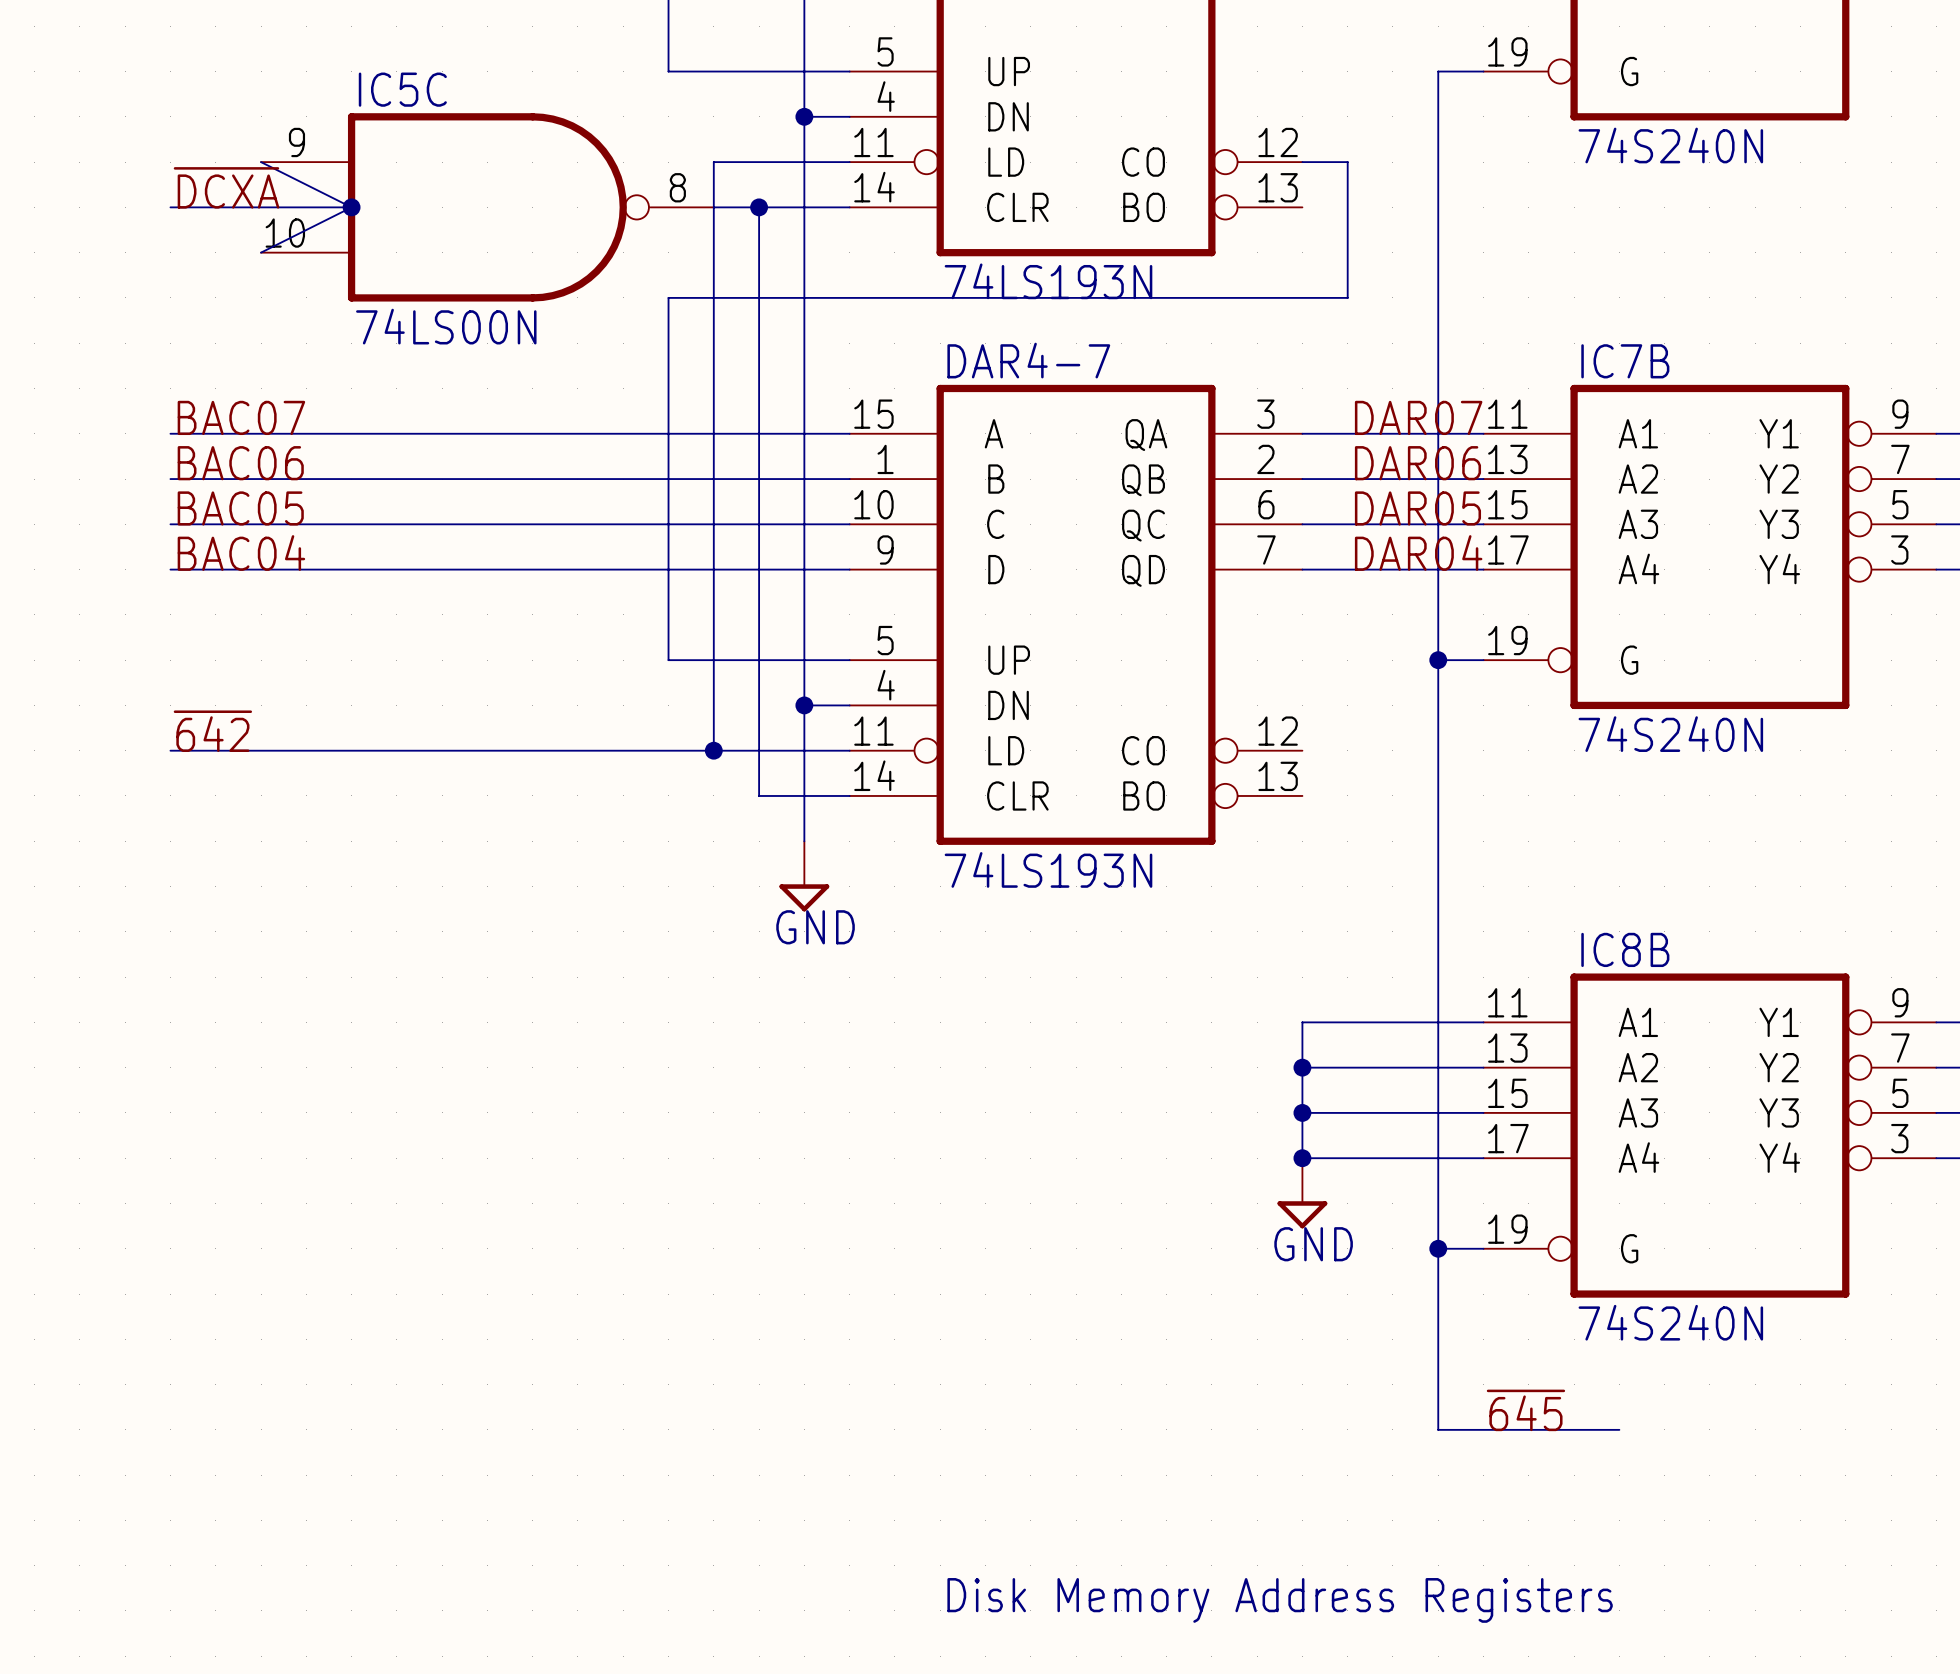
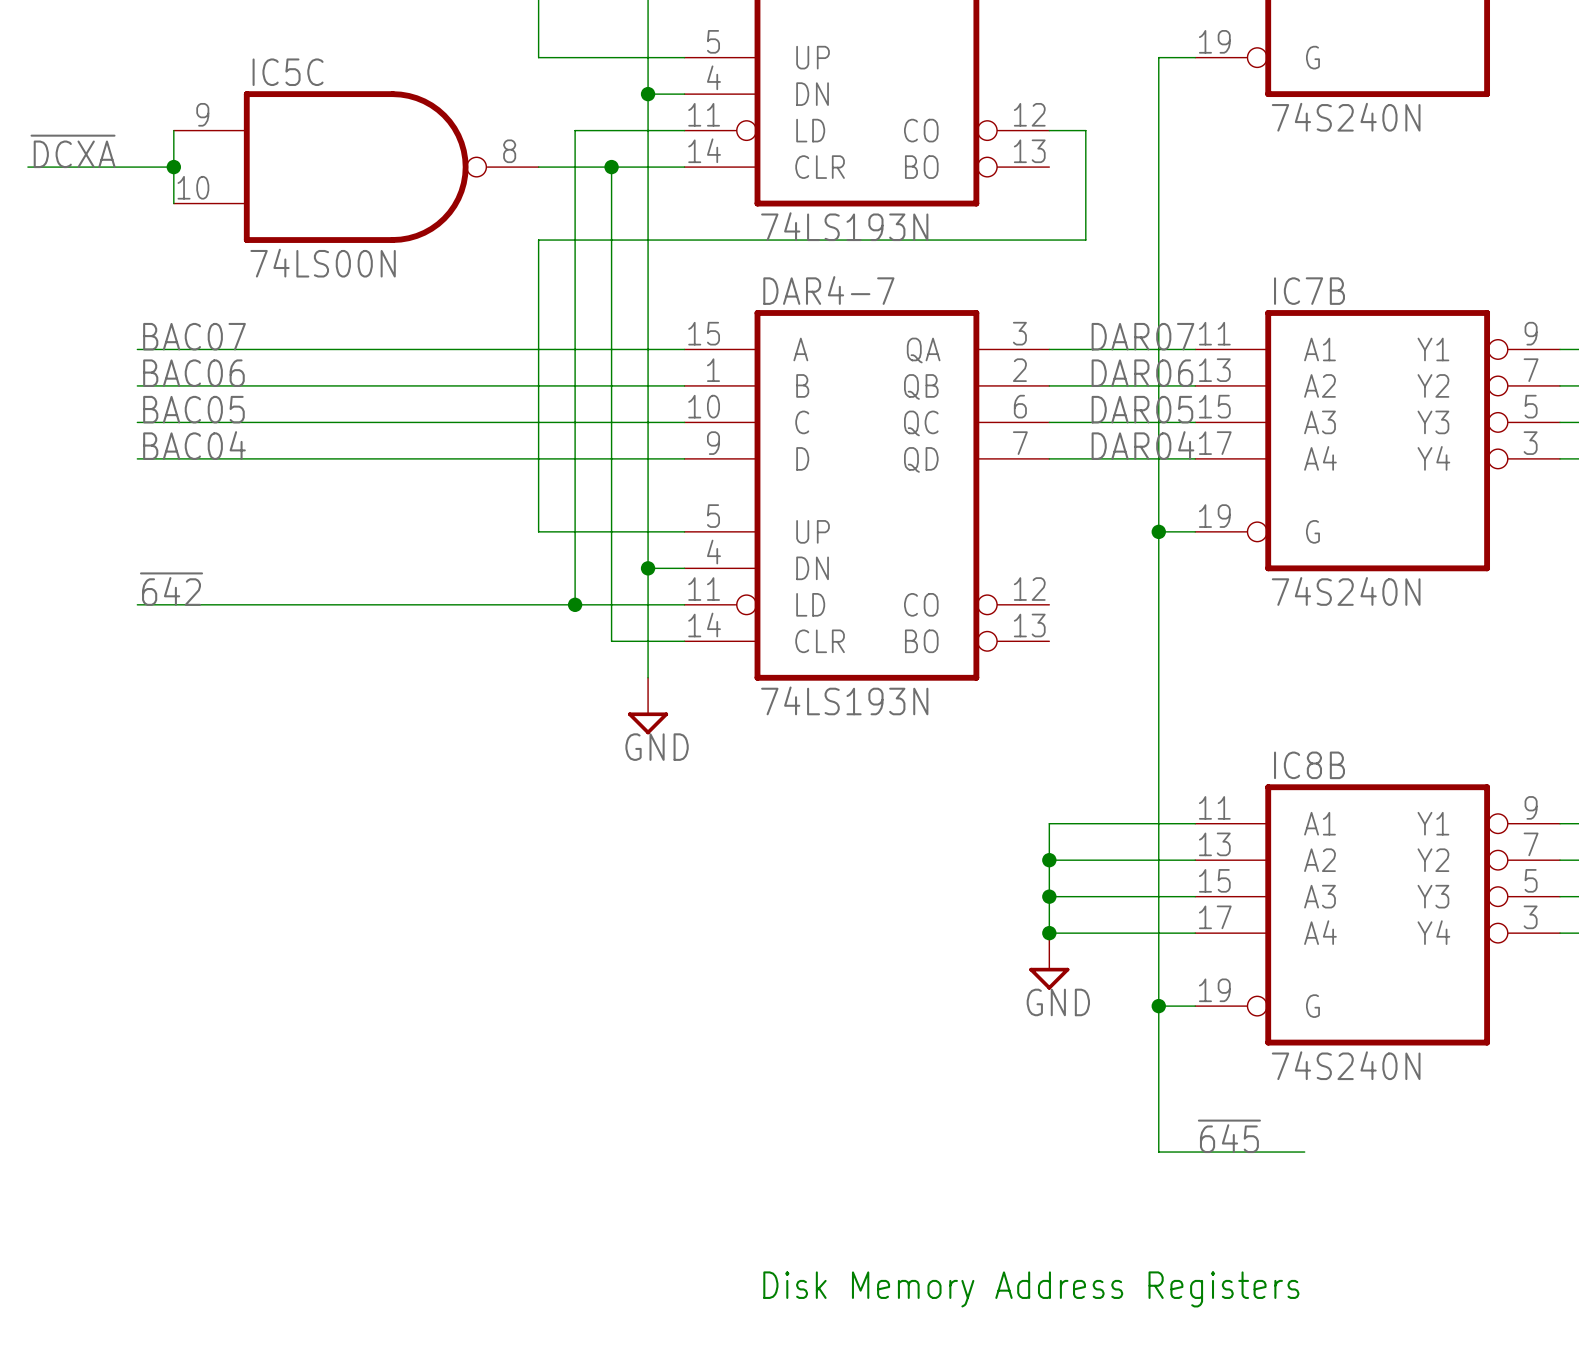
wire: none -> (173, 130) (173, 203)
wire: (261, 162) (351, 207) -> none
label position: ~{DCXA} (226, 187) -> ~{DCXA} (73, 151)
wire: (215, 207) (351, 207) -> (27, 167) (137, 167)
junction: none -> (173, 167)
wire: (351, 207) (261, 252) -> none
junction: (351, 207) -> none
IC5C position: (487, 207) -> (356, 167)

